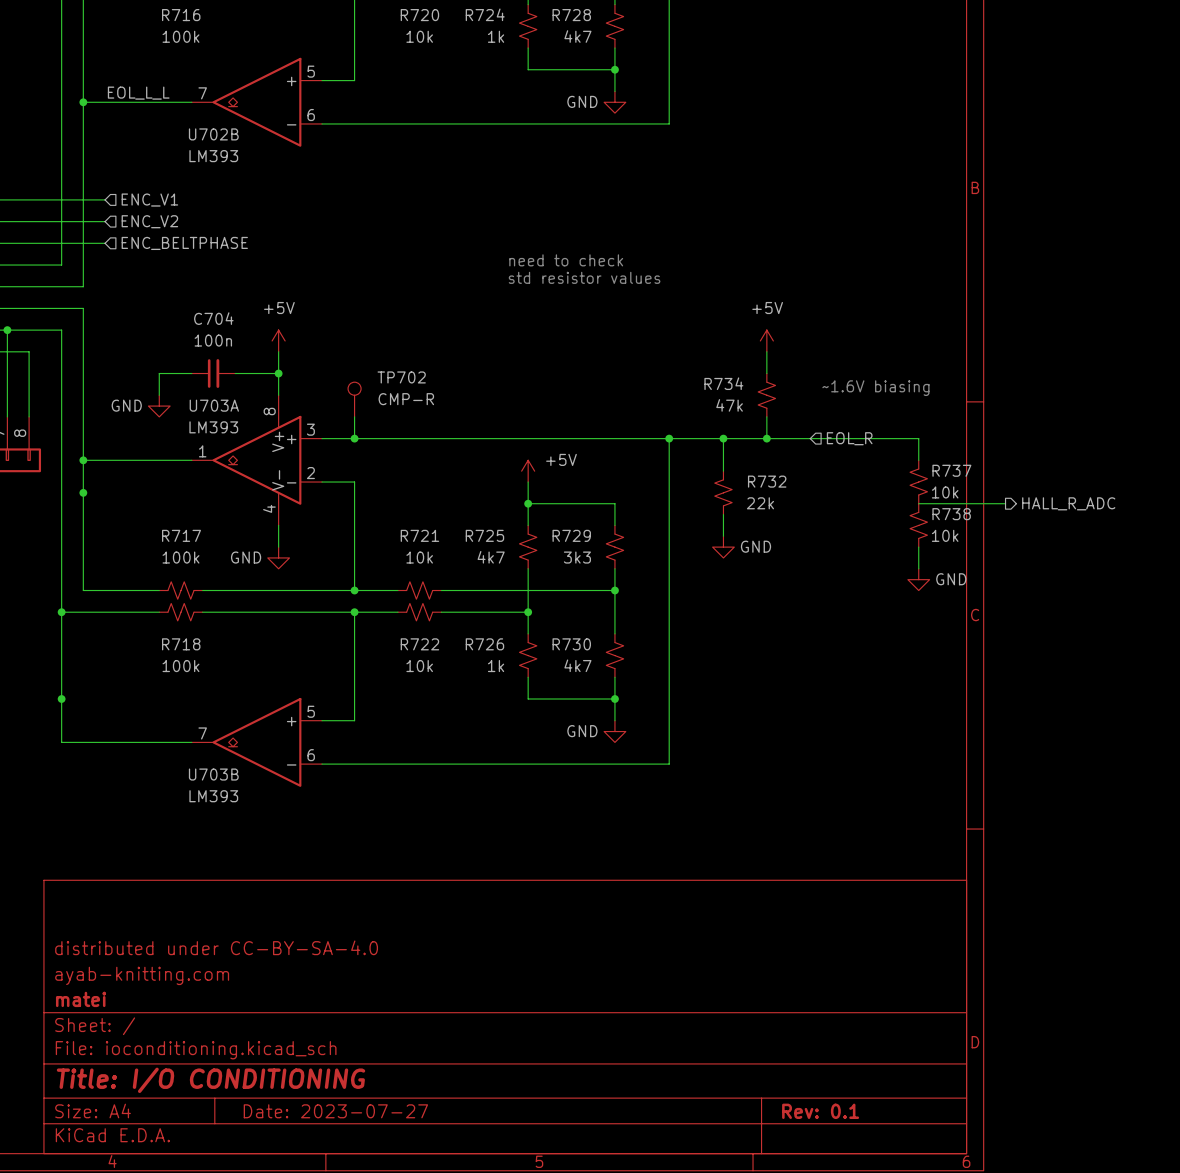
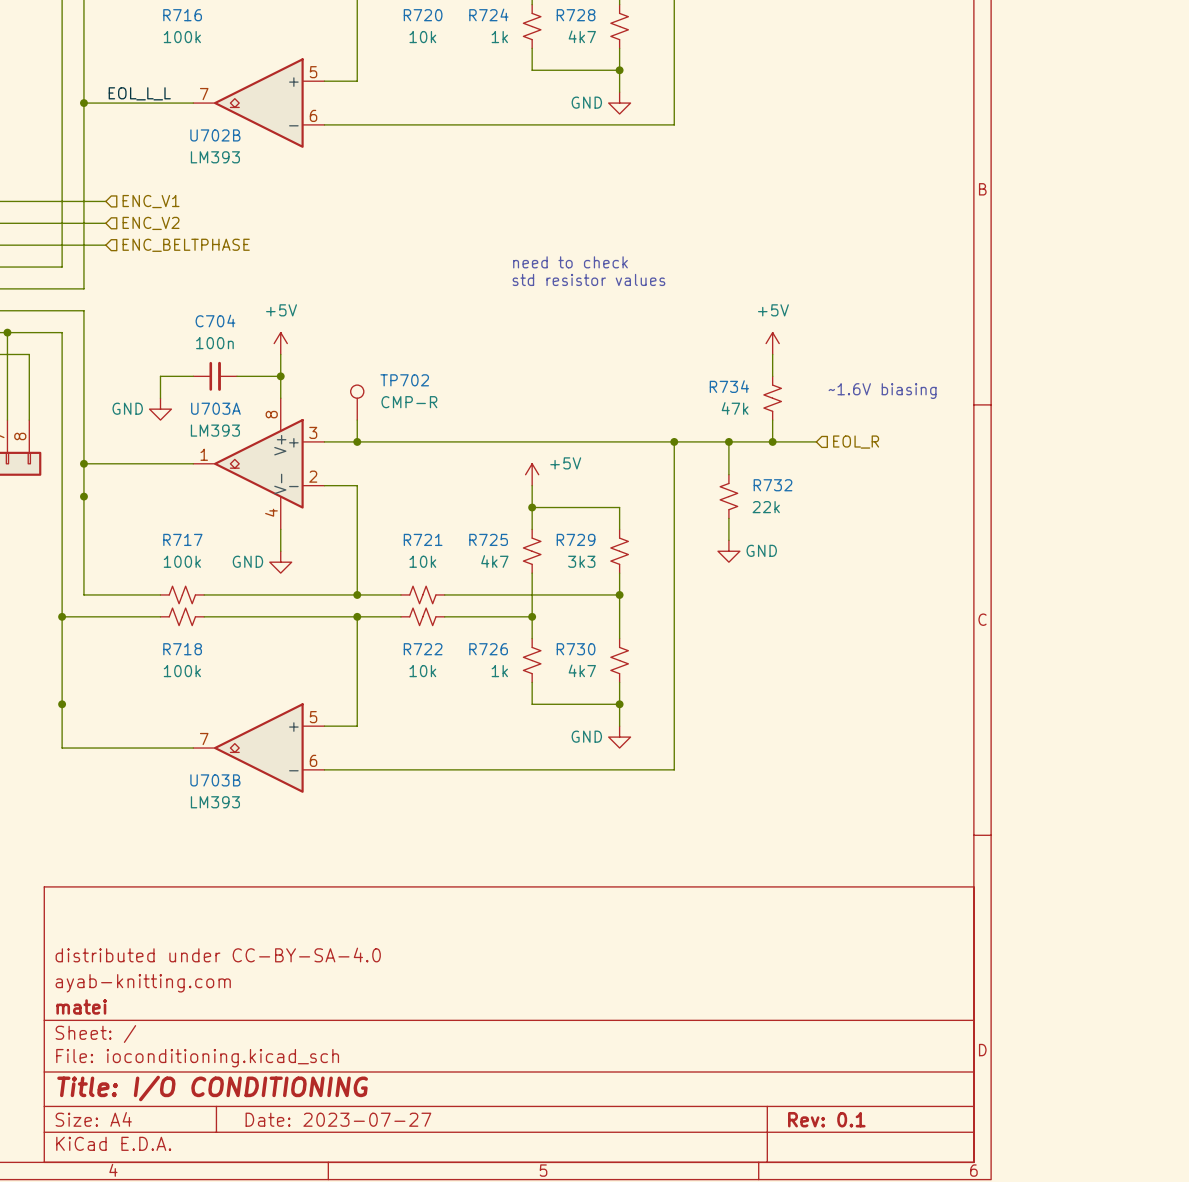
wire: (810, 438) (918, 438) (918, 460) -> none
R737: 10k (918, 482) -> none
wire: (918, 503) (1005, 503) -> none
hierarchical label: HALL_R_ADC (1068, 503) -> none
R738: 10k (918, 525) -> none
wire: (918, 547) (918, 568) -> none
power symbol: GND (918, 579) -> none

